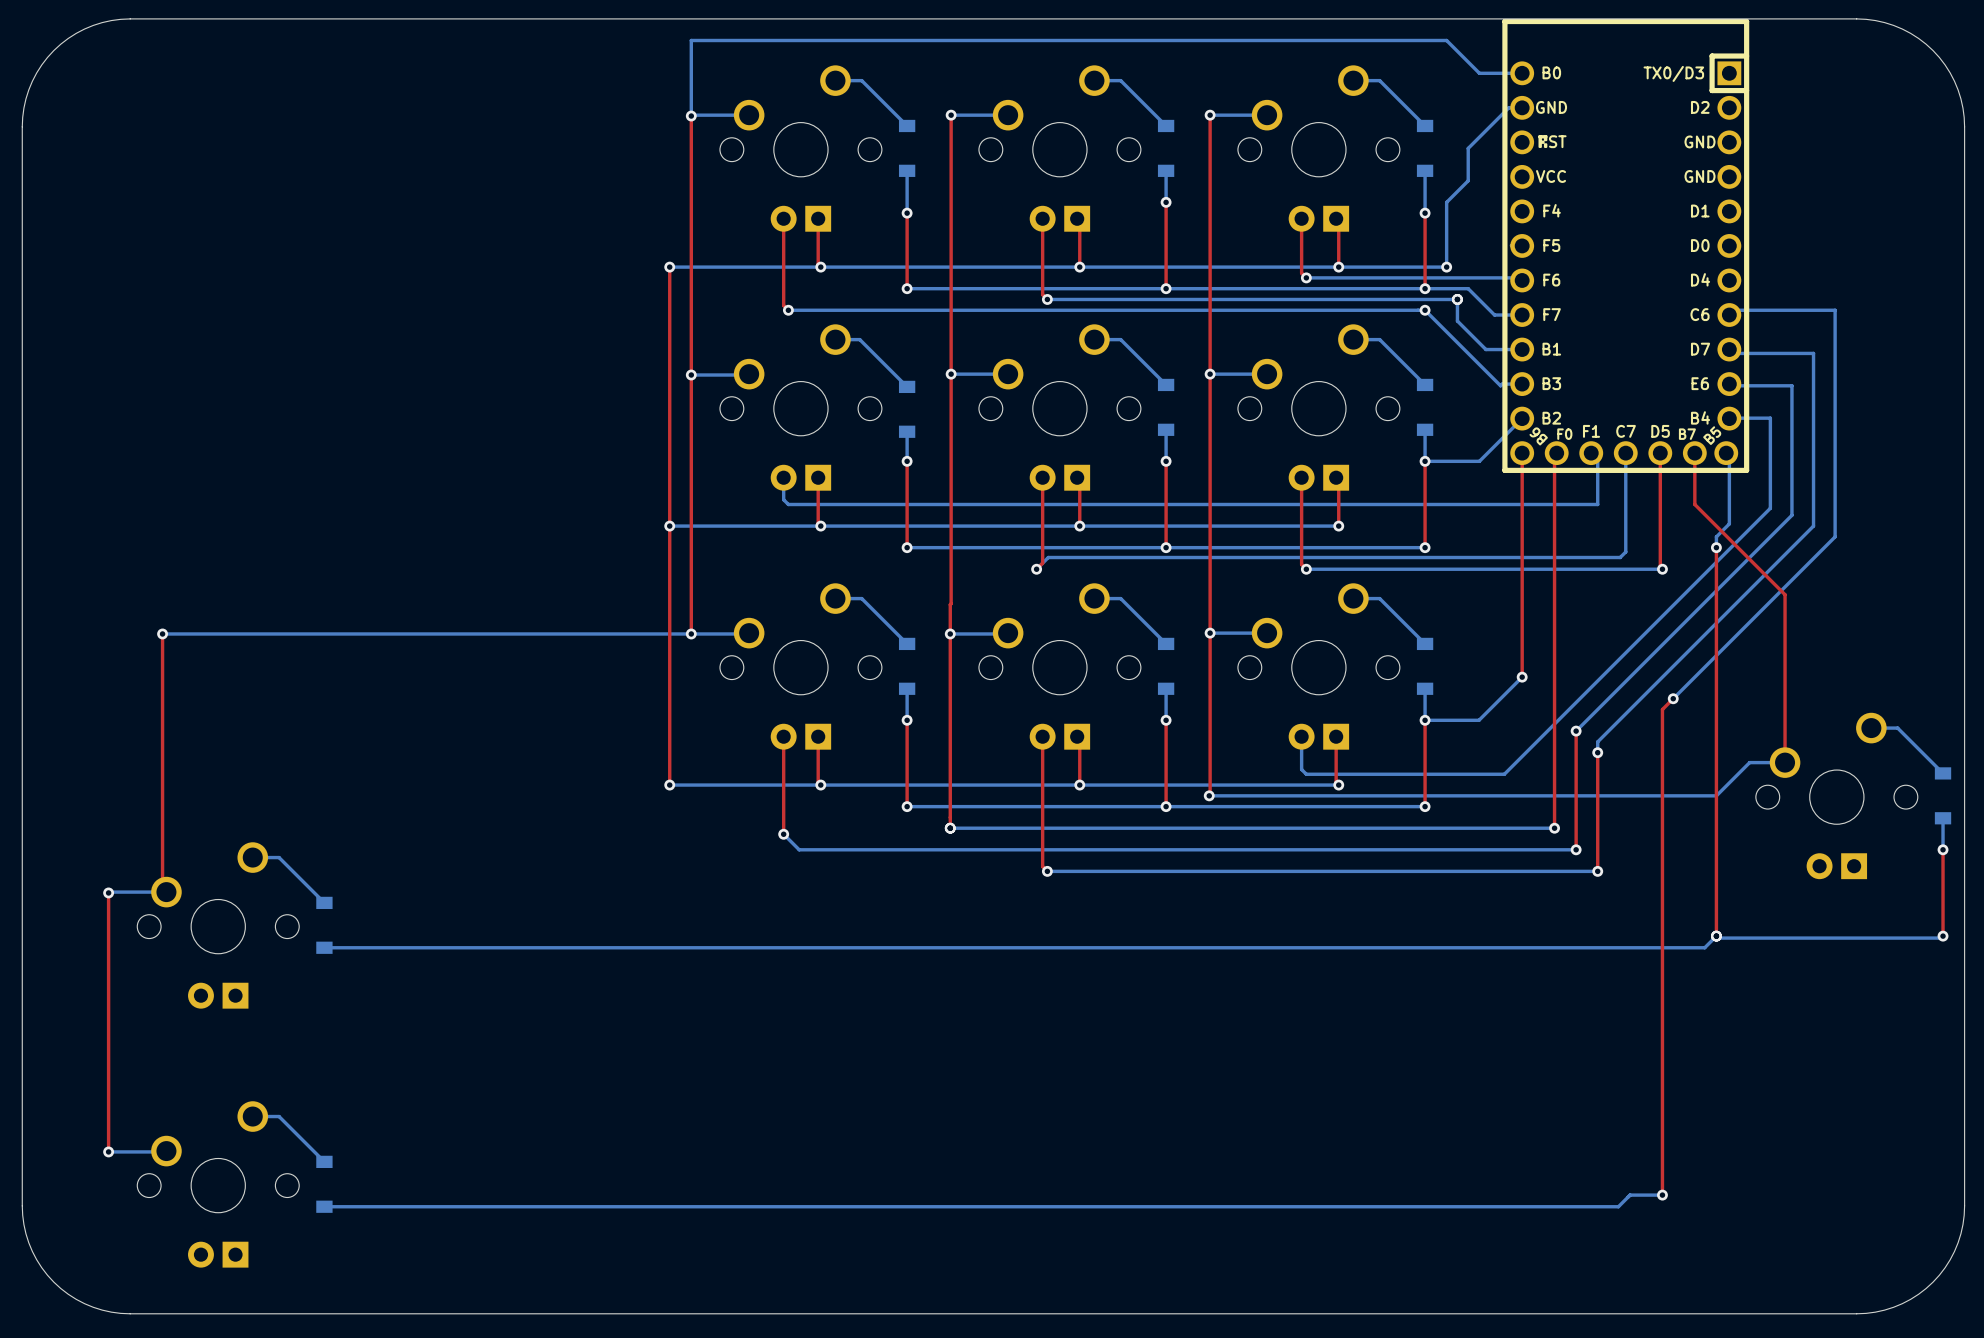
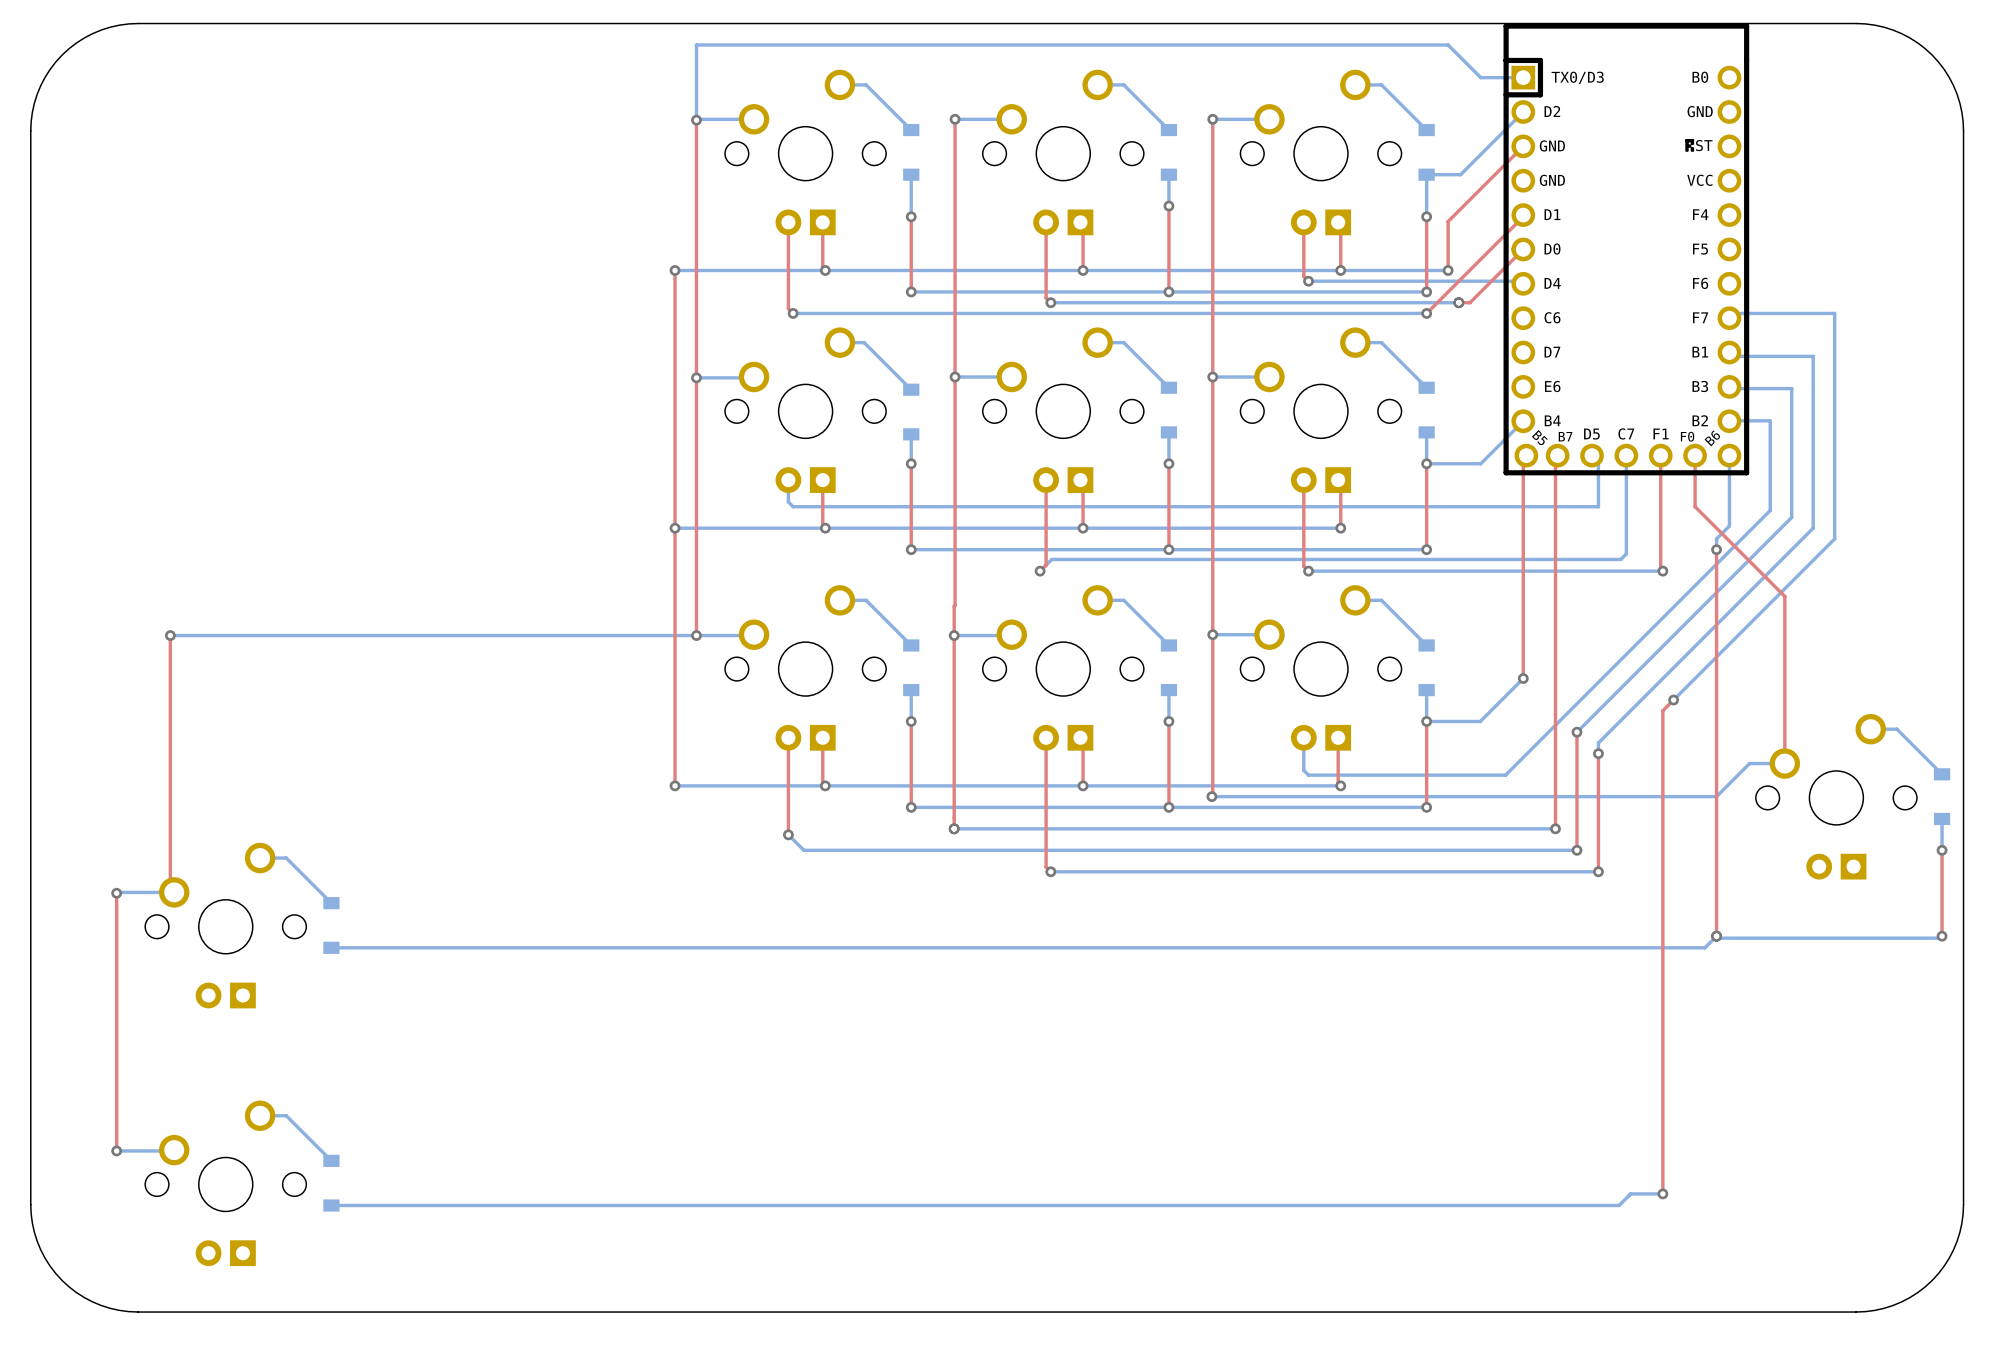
bottom track: (1522, 107) (1508, 107) (1468, 148) (1468, 180) (1446, 202) (1446, 267) -> (1523, 112) (1460, 174) (1426, 174)
top track: none -> (1523, 146) (1448, 221) (1448, 270)
top track: none -> (1523, 216) (1426, 313)
top track: none -> (1523, 249) (1470, 302) (1458, 302)
part side: bottom (1625, 245) -> top (1626, 249)
bottom track: (1425, 288) (1468, 288) (1494, 315) (1522, 315) -> none
bottom track: (1457, 299) (1457, 321) (1485, 349) (1522, 349) -> none
bottom track: (1425, 310) (1500, 385) (1502, 384) (1522, 384) -> none

